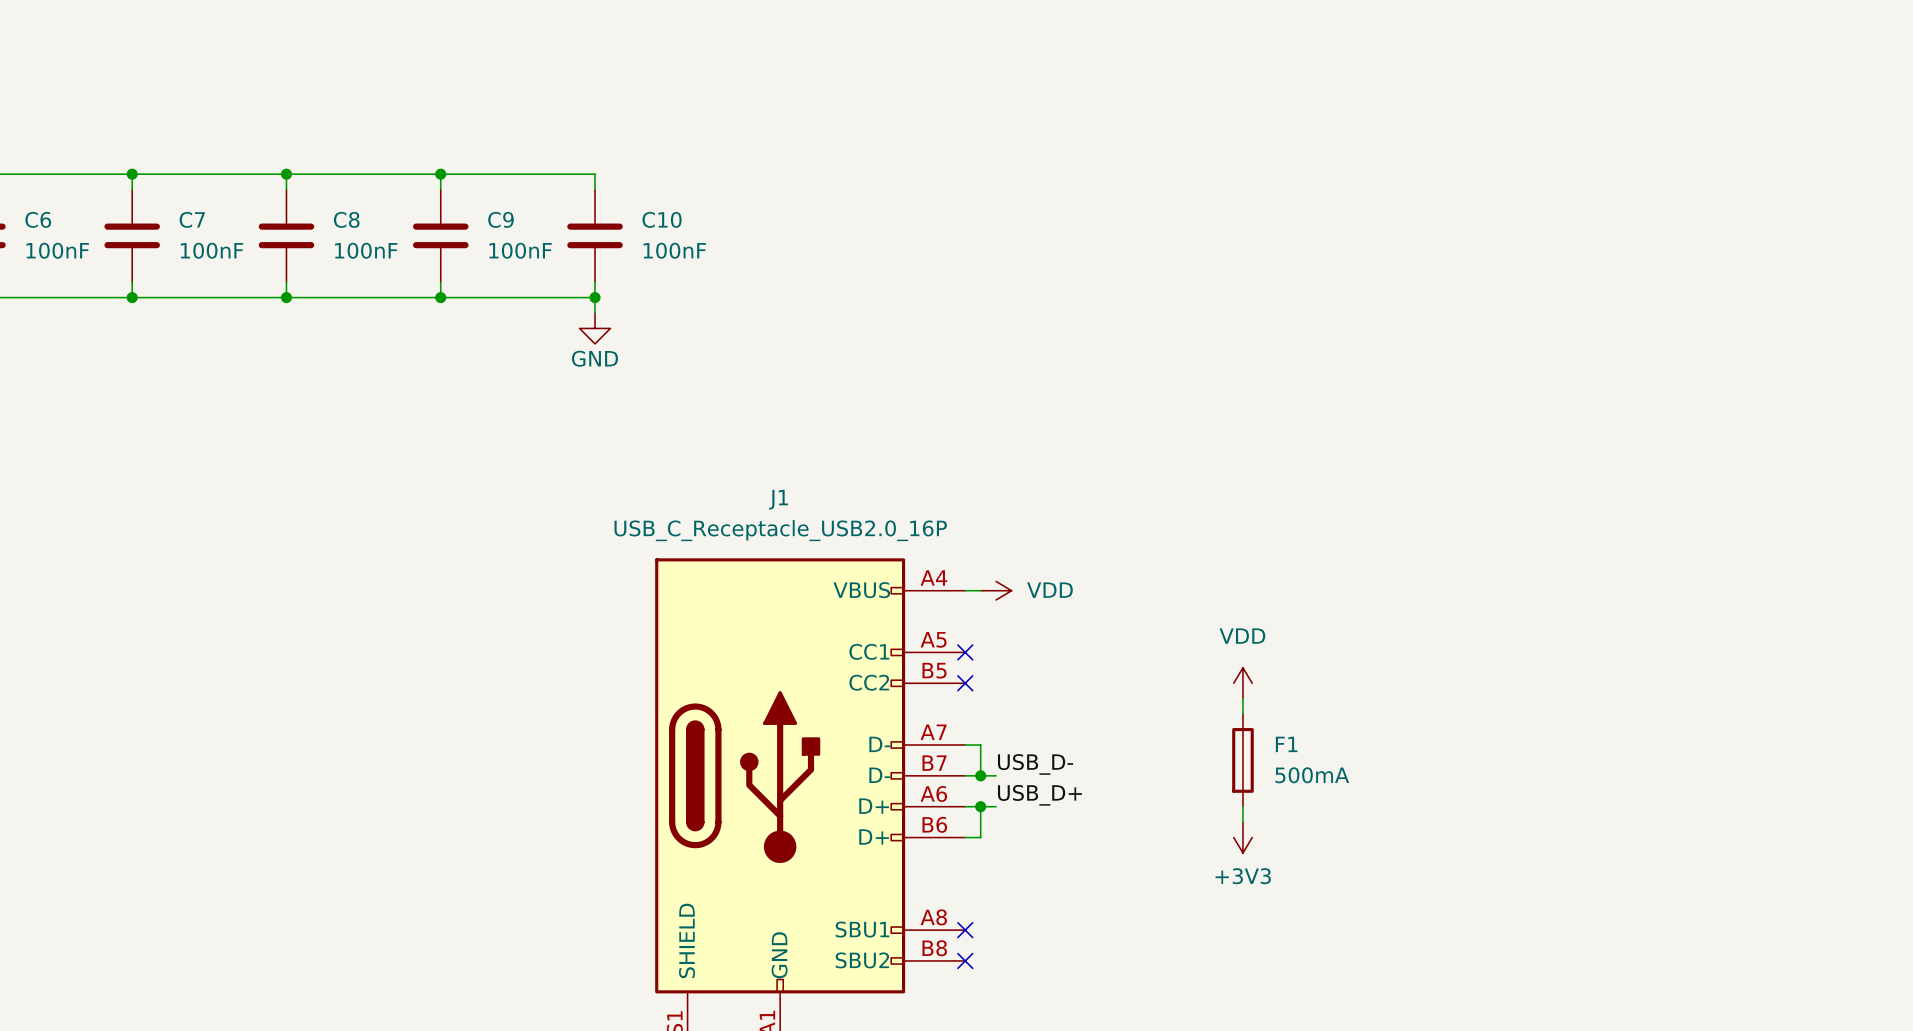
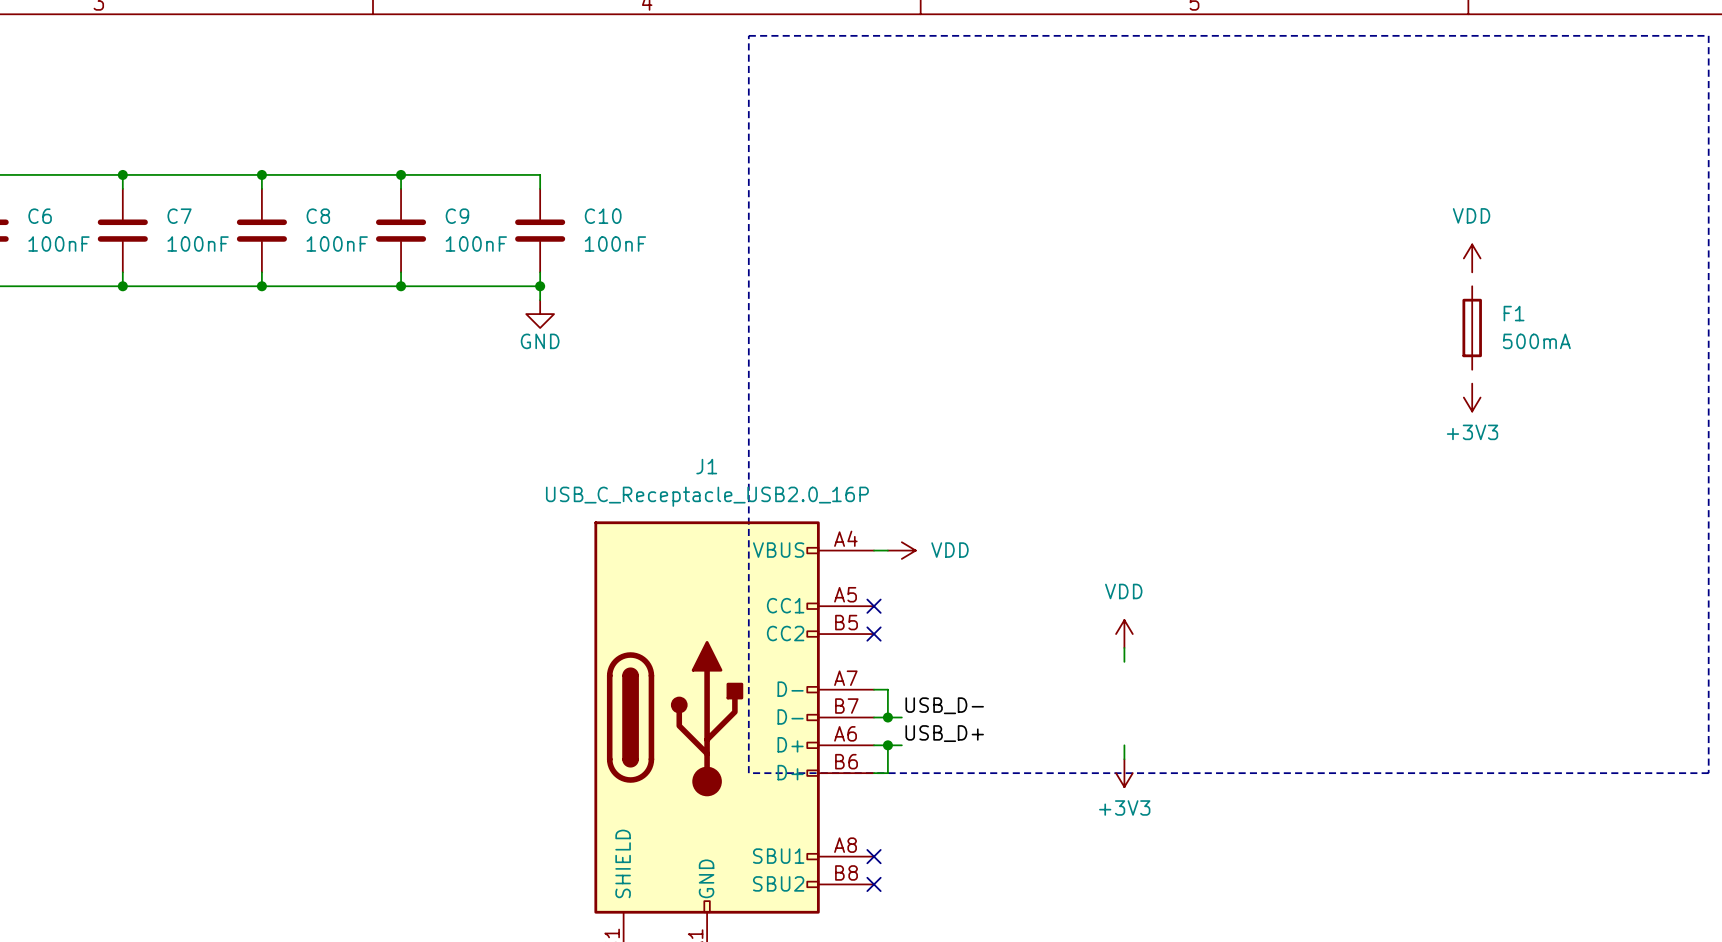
line: none -> (748, 35) (1708, 35) (1708, 773) (748, 773) (748, 35)
power symbol: none -> VDD (1472, 258)
power symbol: none -> +3V3 (1472, 397)
F1 position: (1242, 760) -> (1472, 327)

